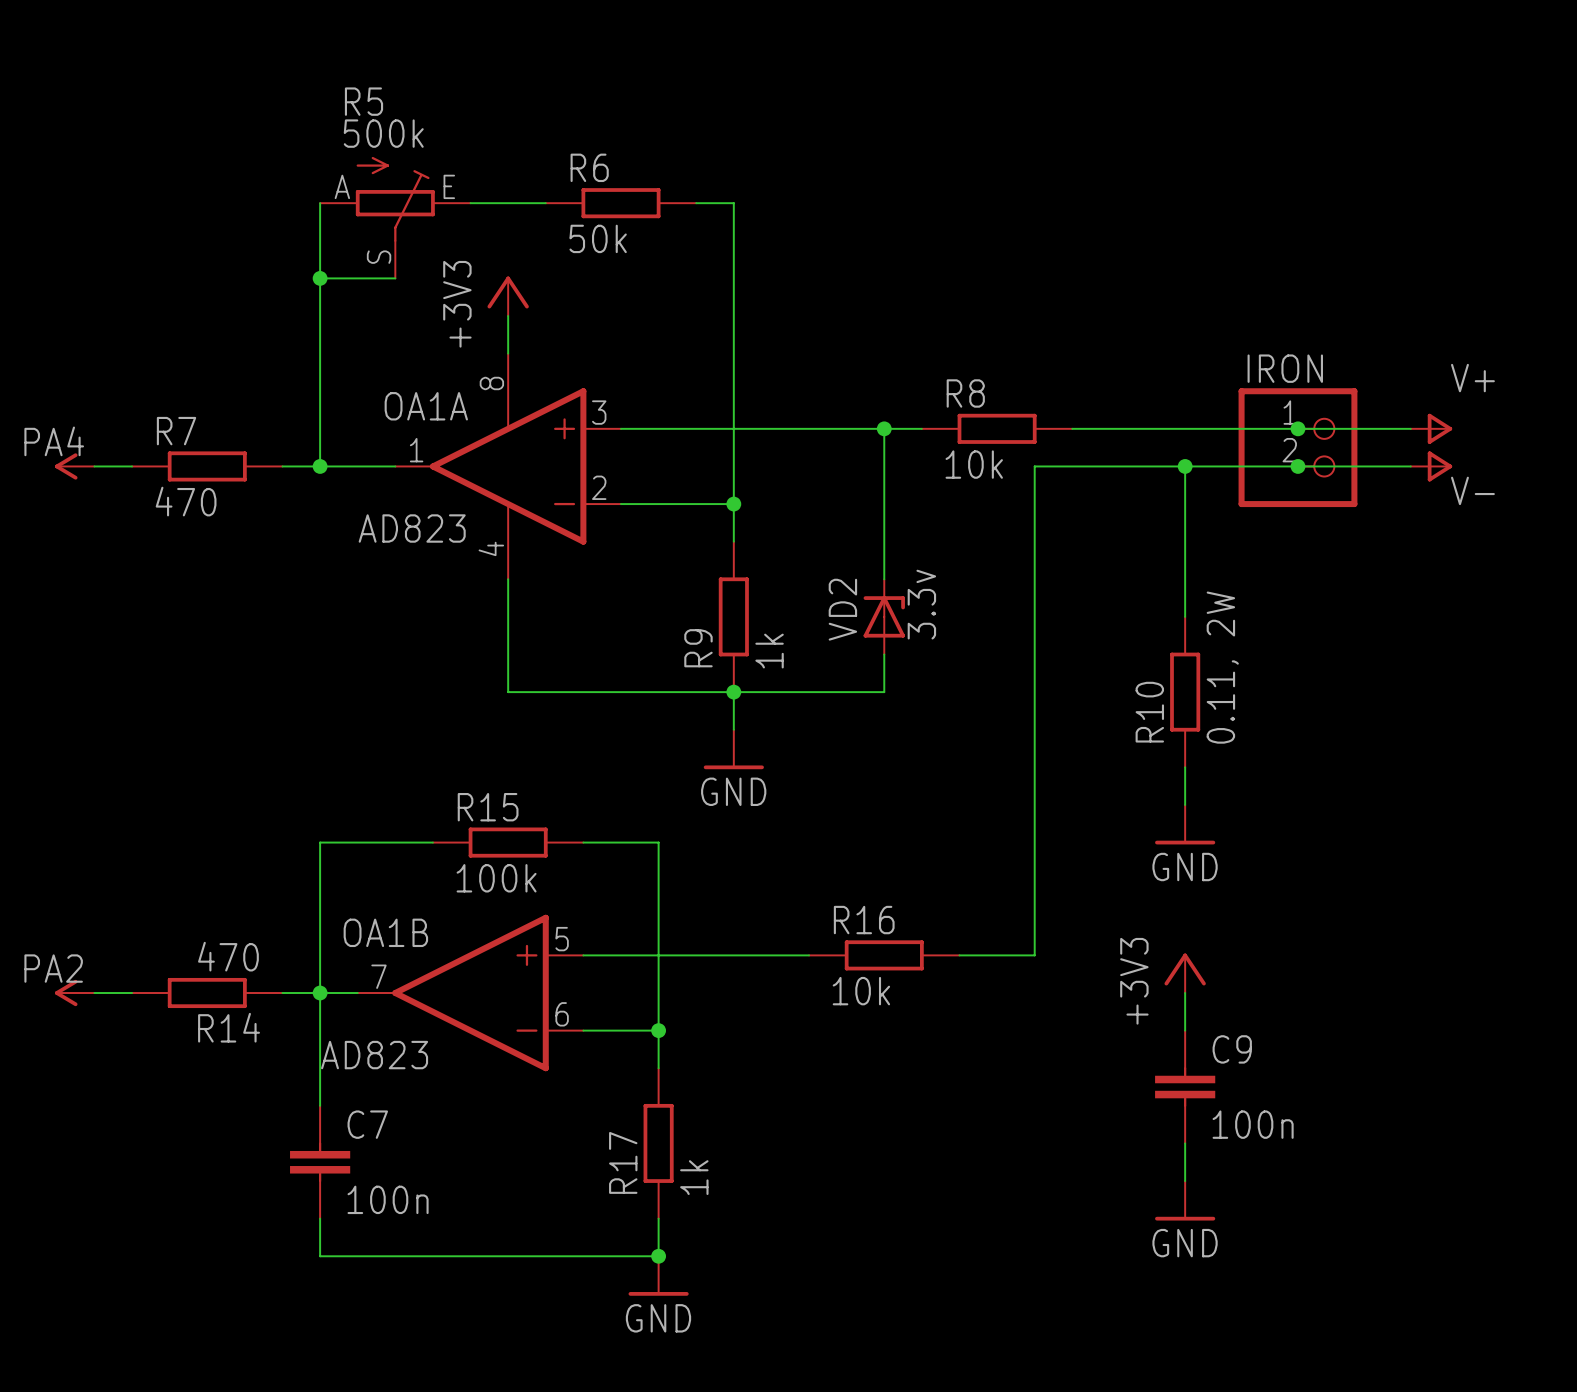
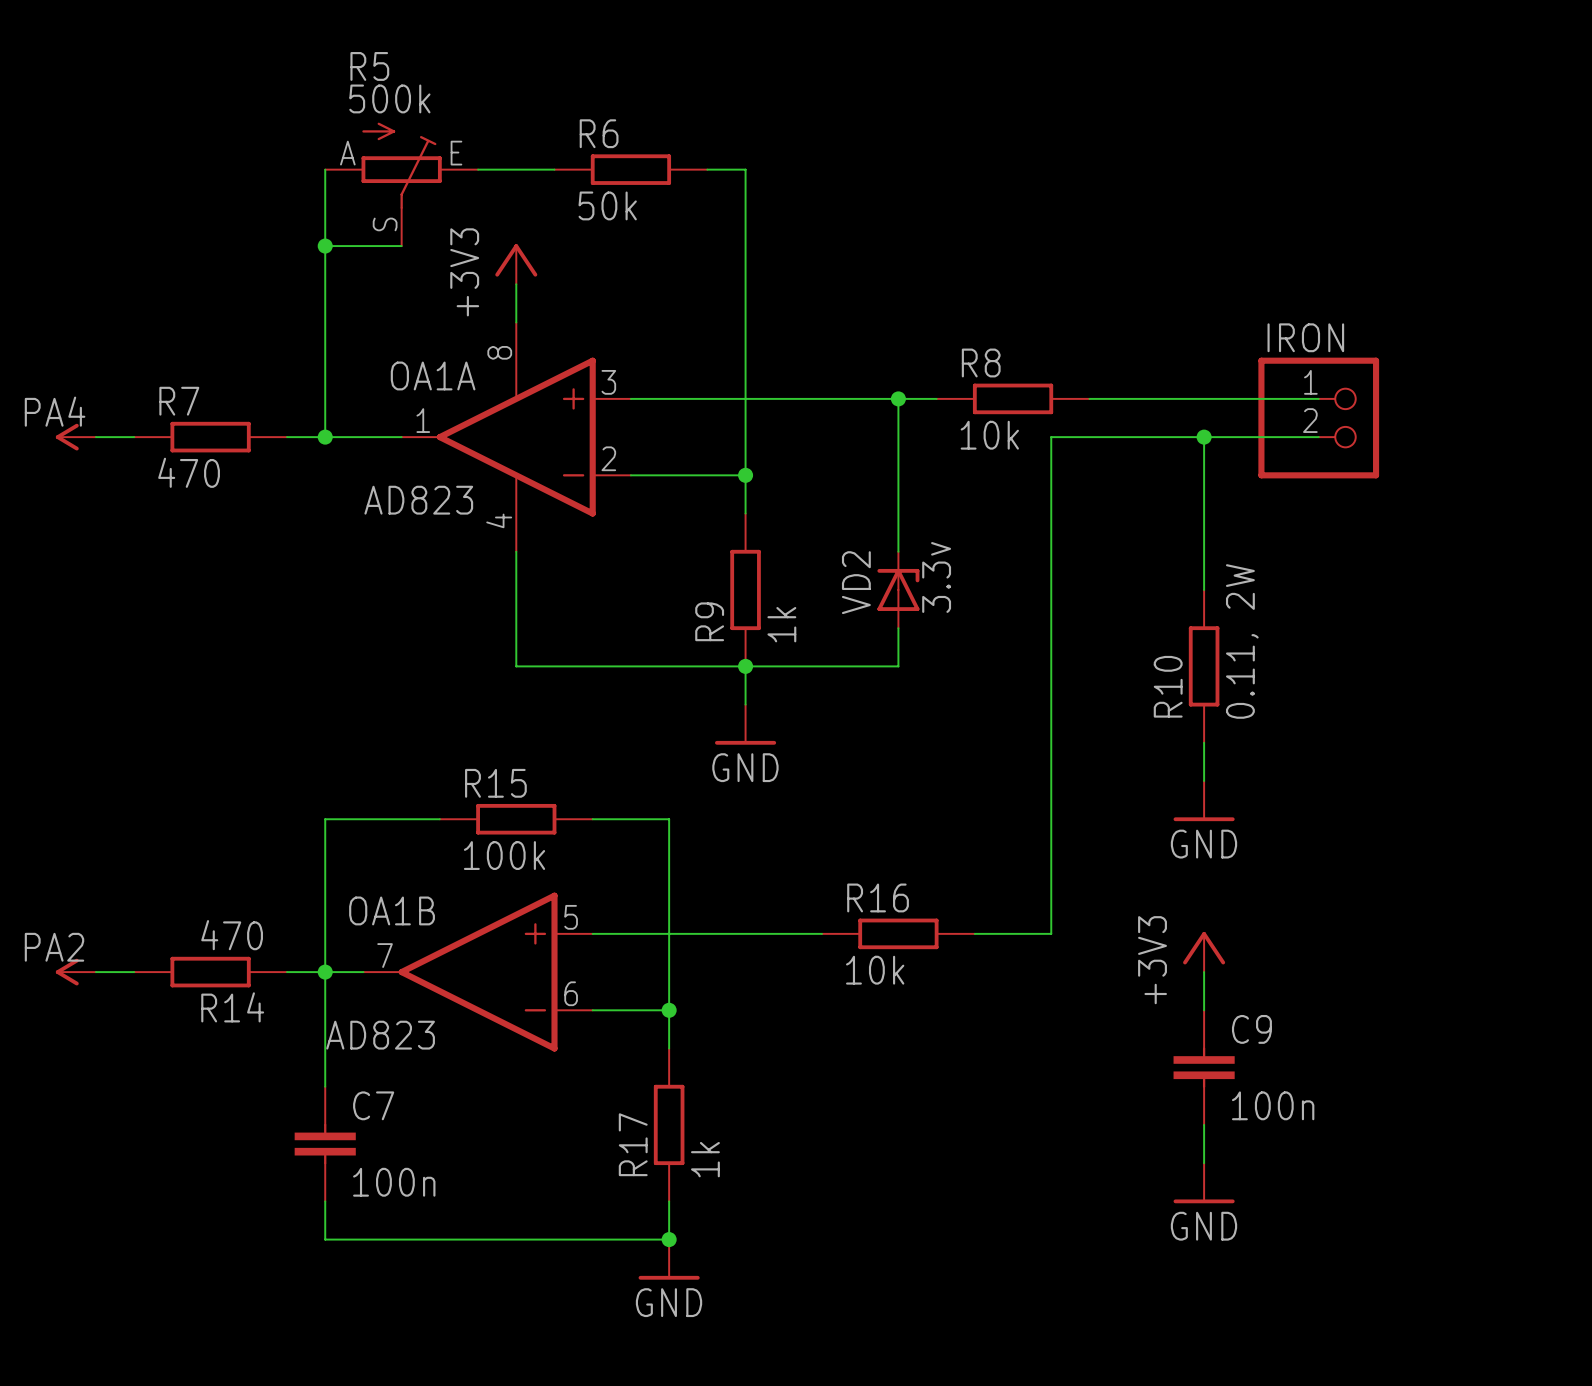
wire: (1297, 428) (1410, 428) -> none
junction: (1297, 428) -> none
power symbol: V+ (1431, 428) -> none
wire: (1297, 466) (1410, 466) -> none
junction: (1297, 466) -> none
power symbol: V- (1431, 466) -> none

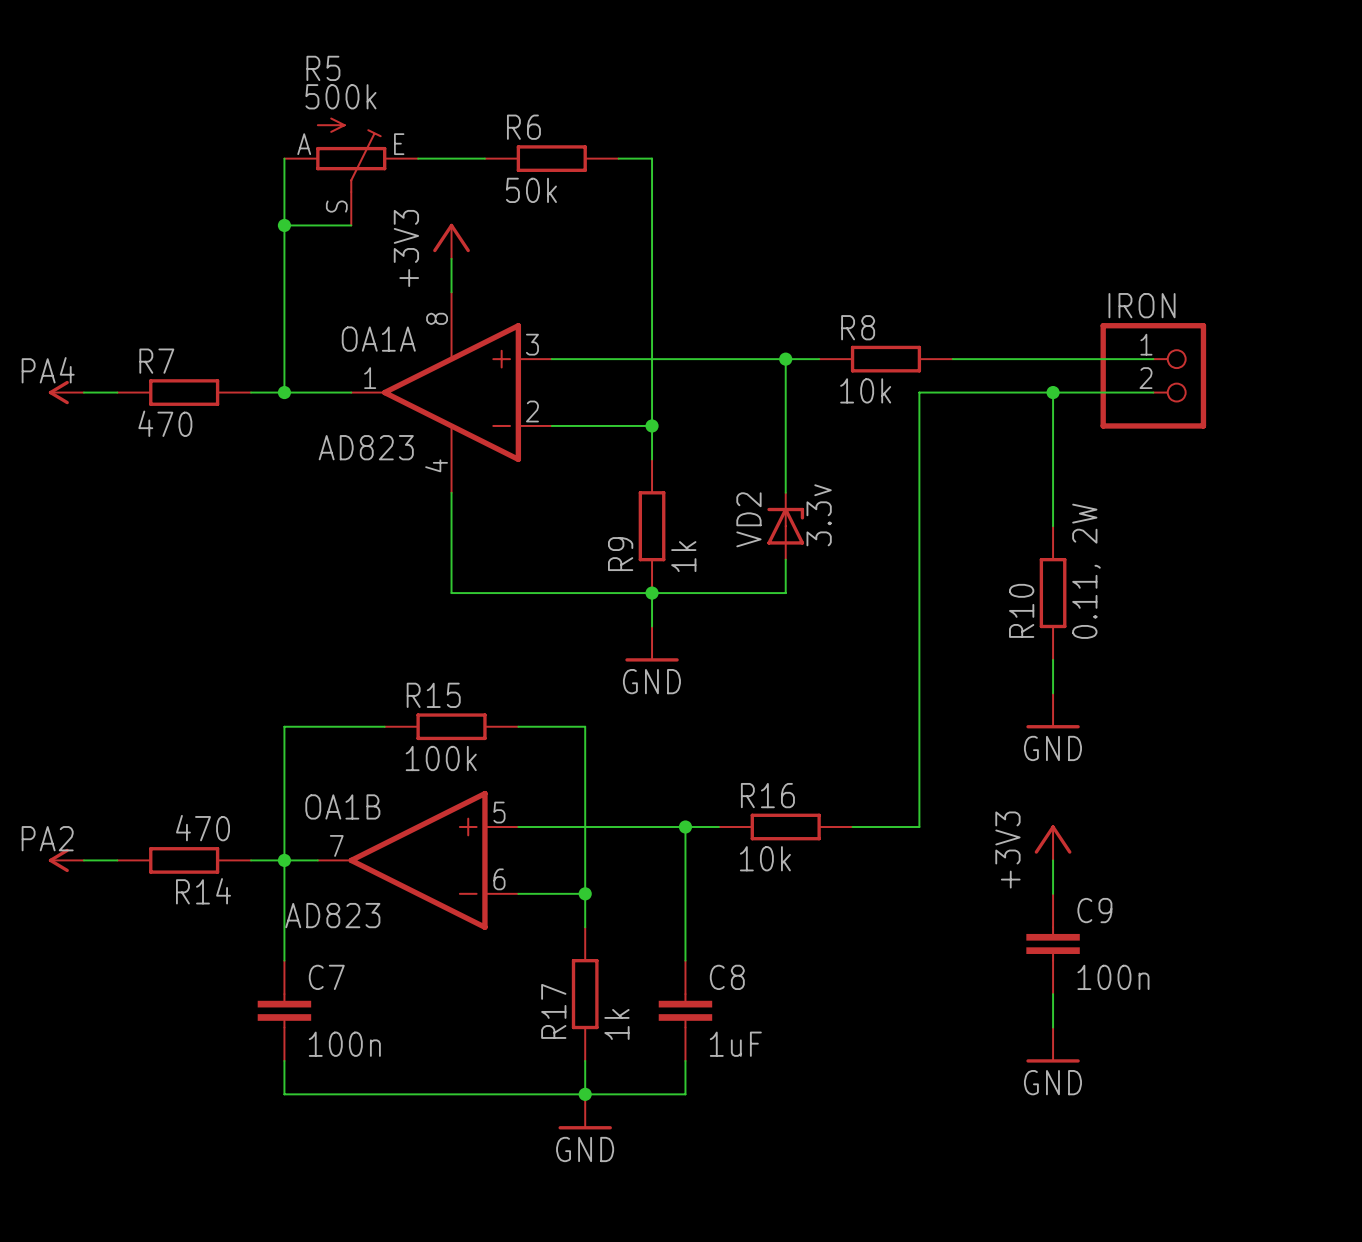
wire: none -> (685, 827) (685, 960)
junction: none -> (685, 827)
C8: none -> 1uF (685, 1010)
wire: none -> (685, 1060) (685, 1094) (585, 1094)

